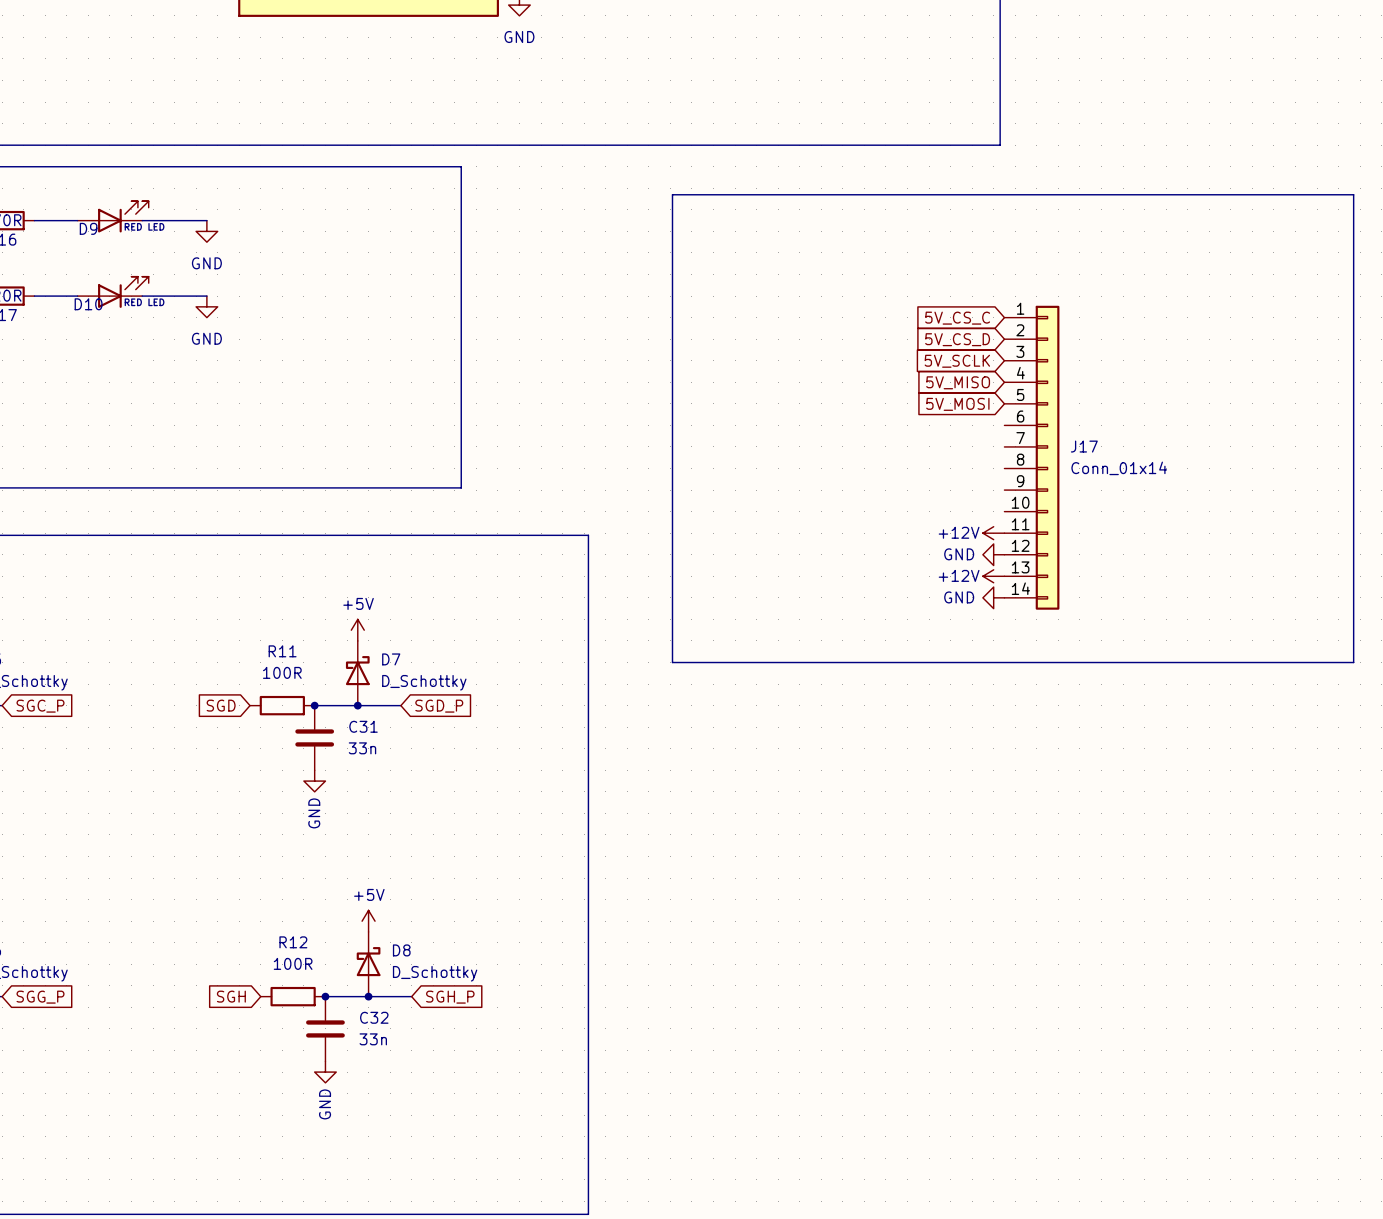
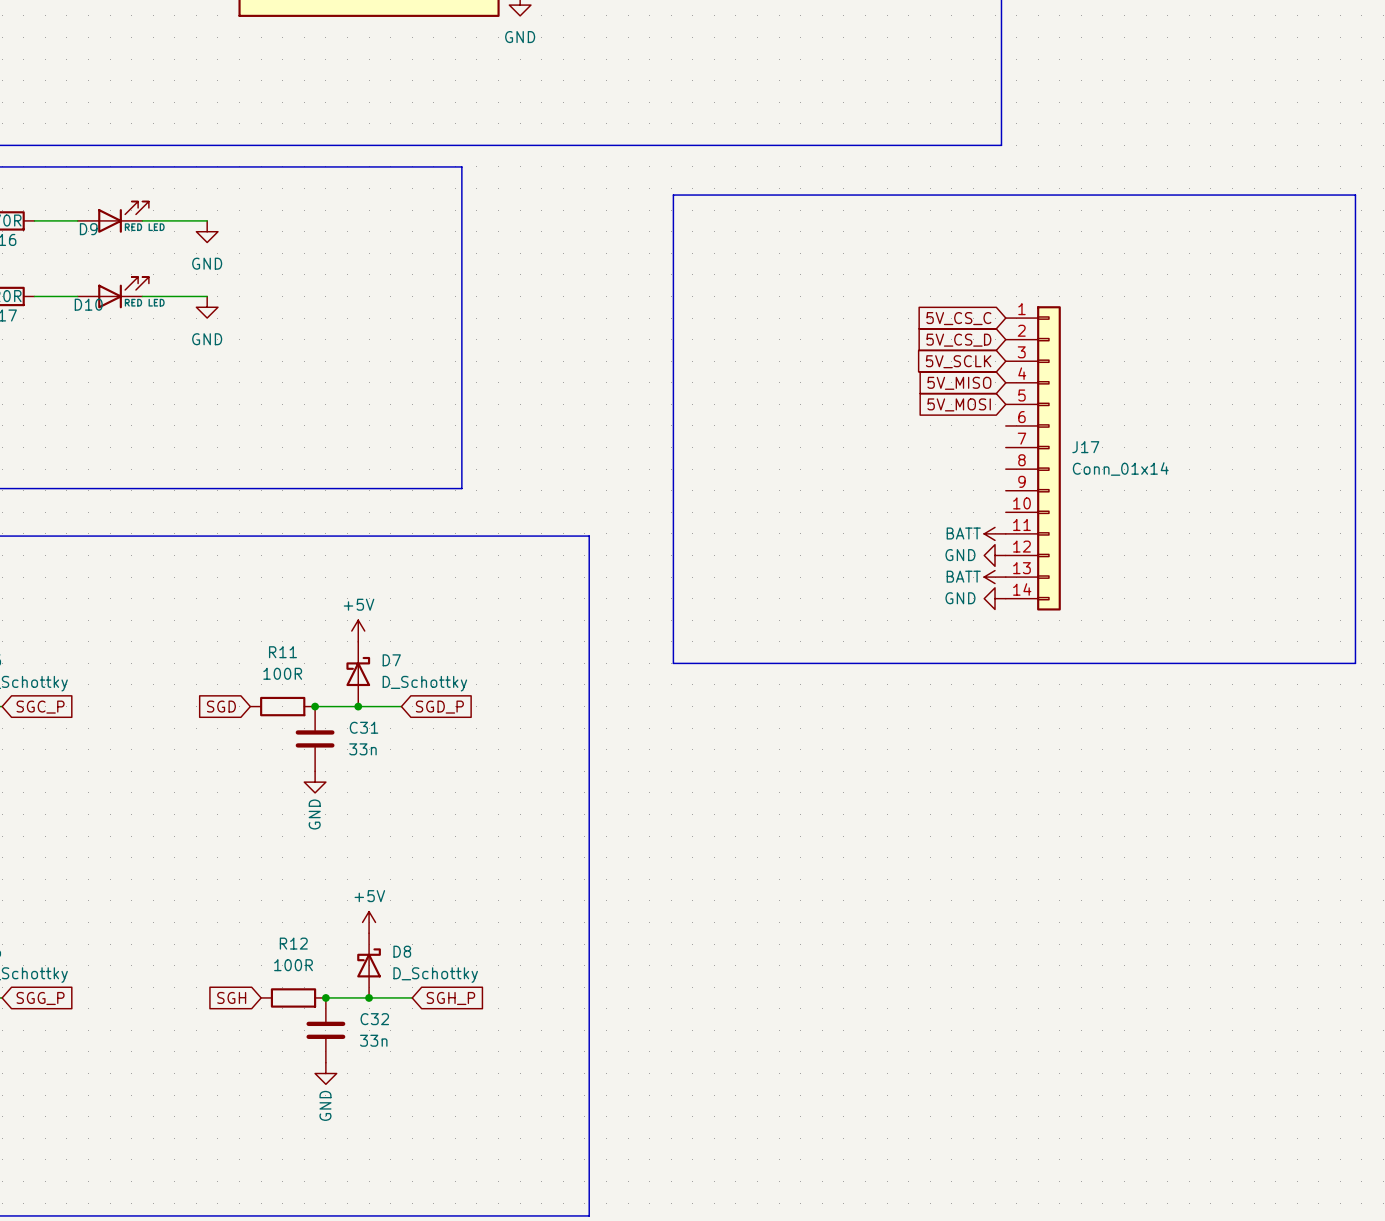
power symbol: +12V (993, 533) -> BATT (995, 533)
power symbol: +12V (993, 576) -> BATT (995, 577)

